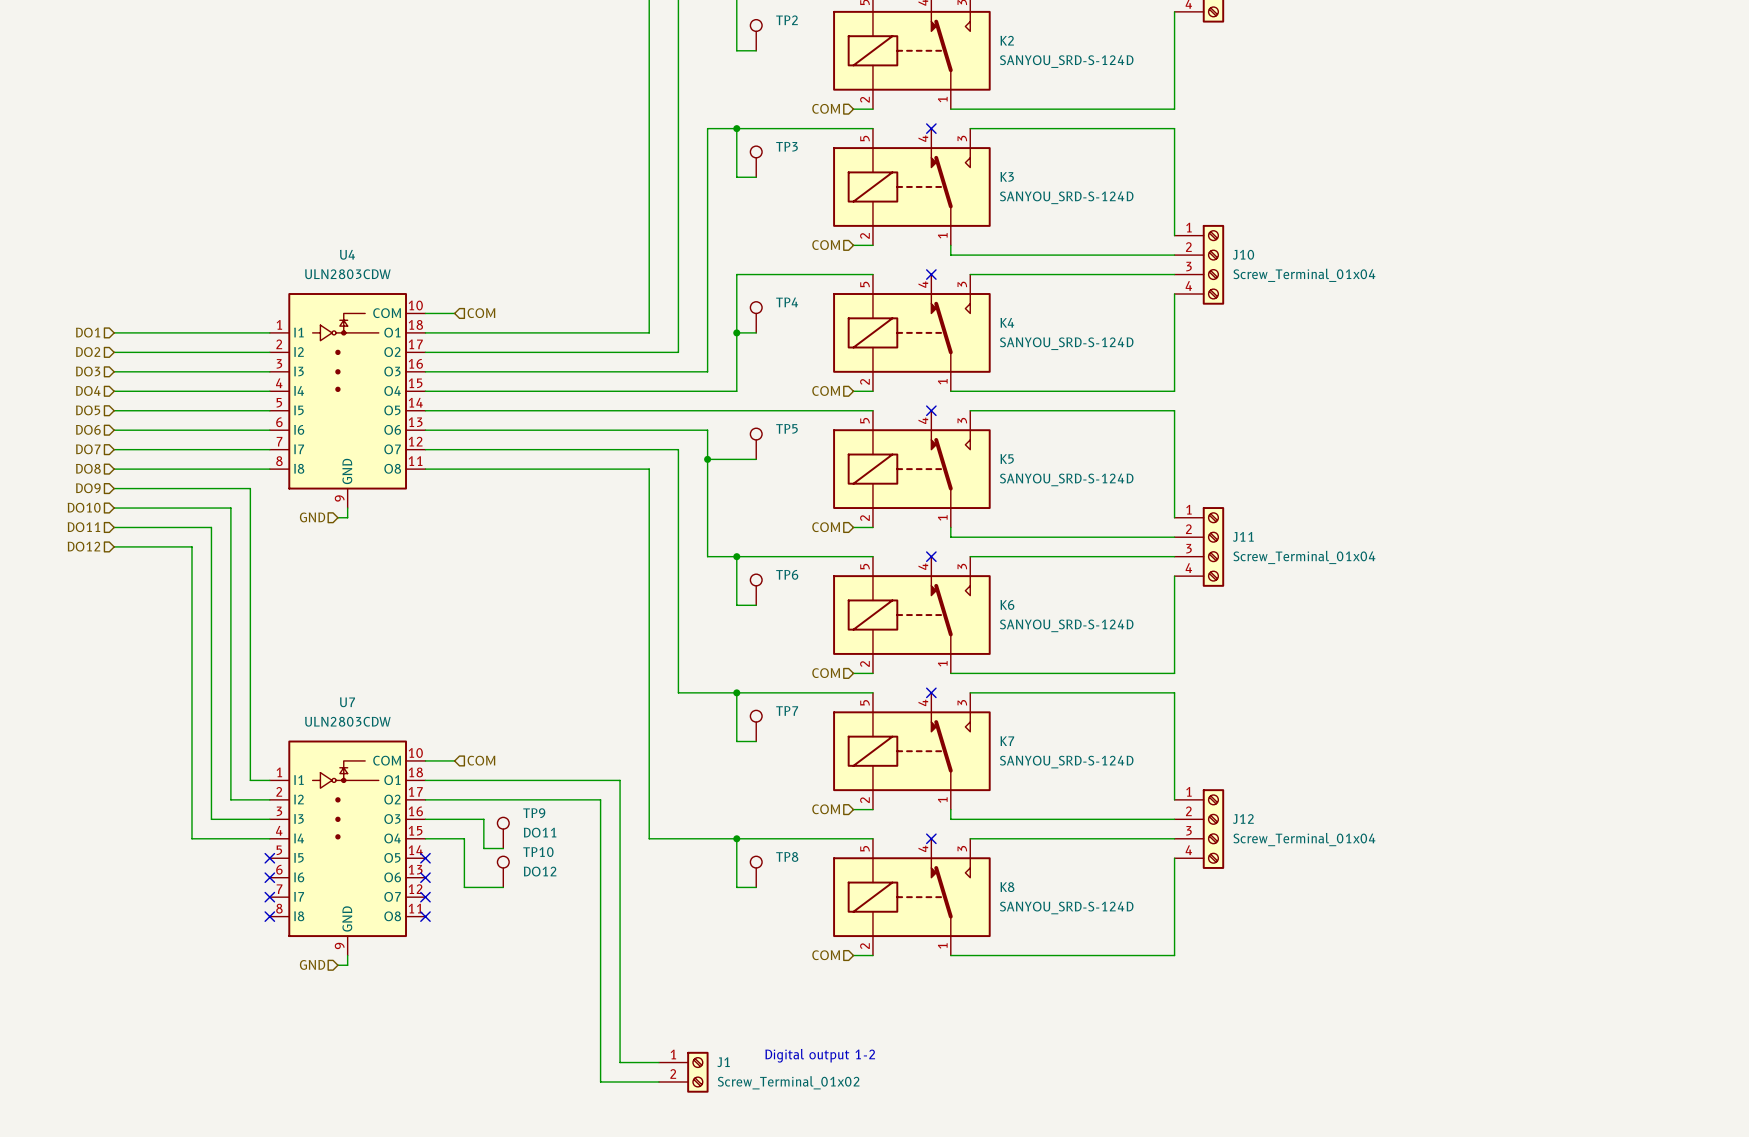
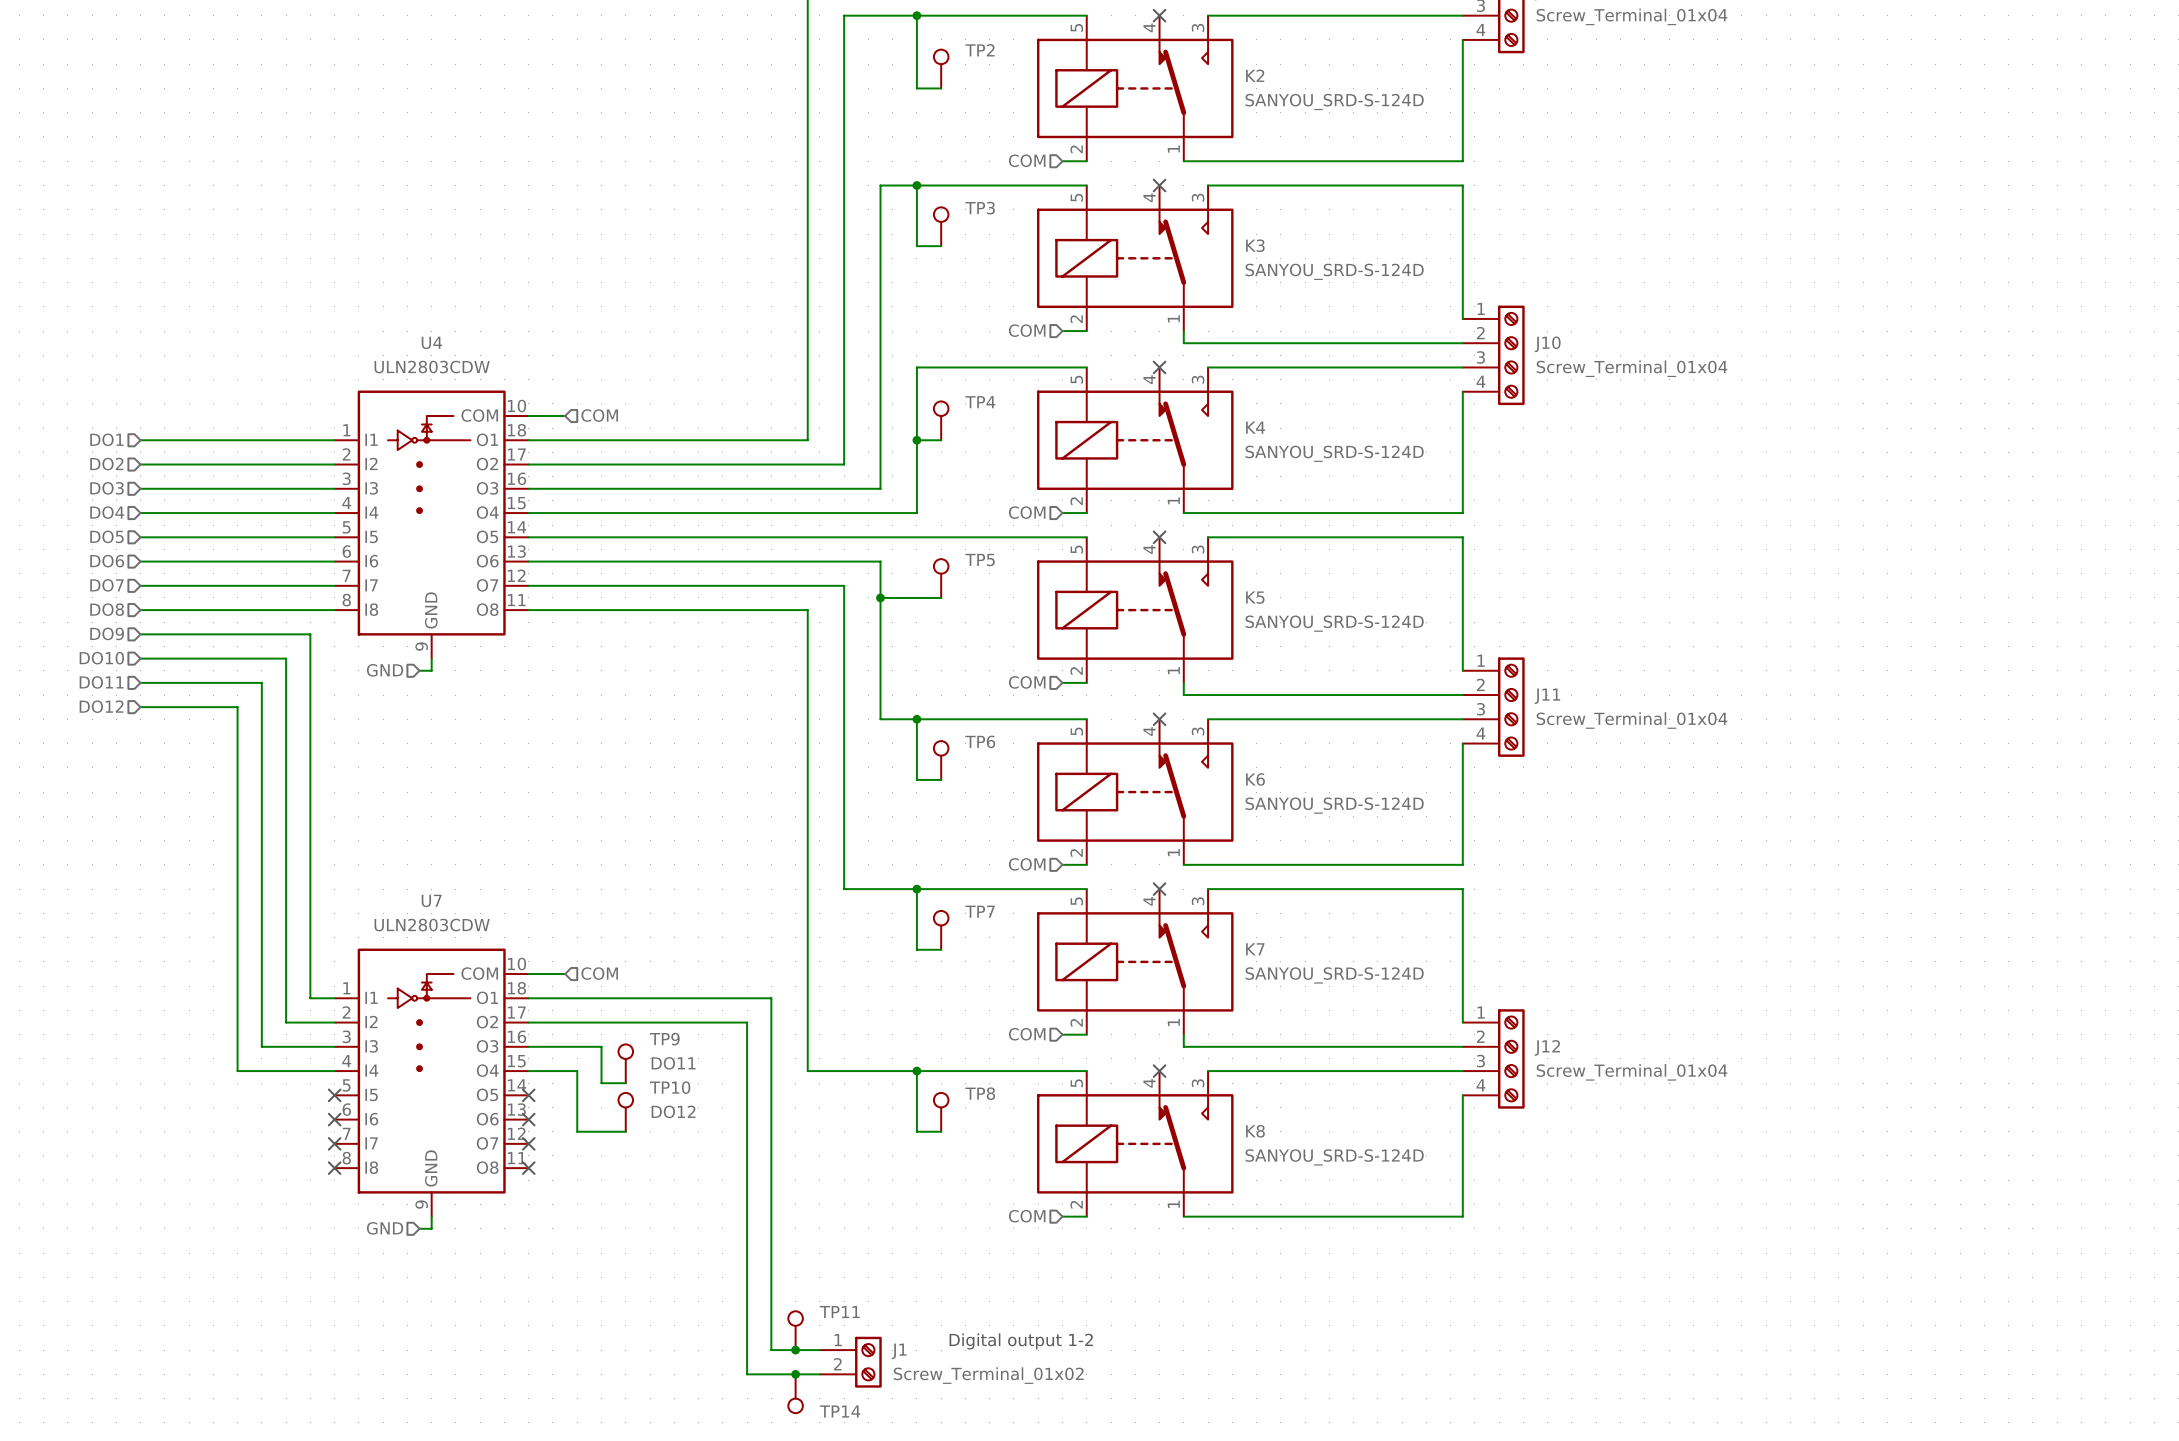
TP11: none -> (795, 1330)
junction: none -> (795, 1350)
junction: none -> (795, 1374)
TP14: none -> (795, 1393)

